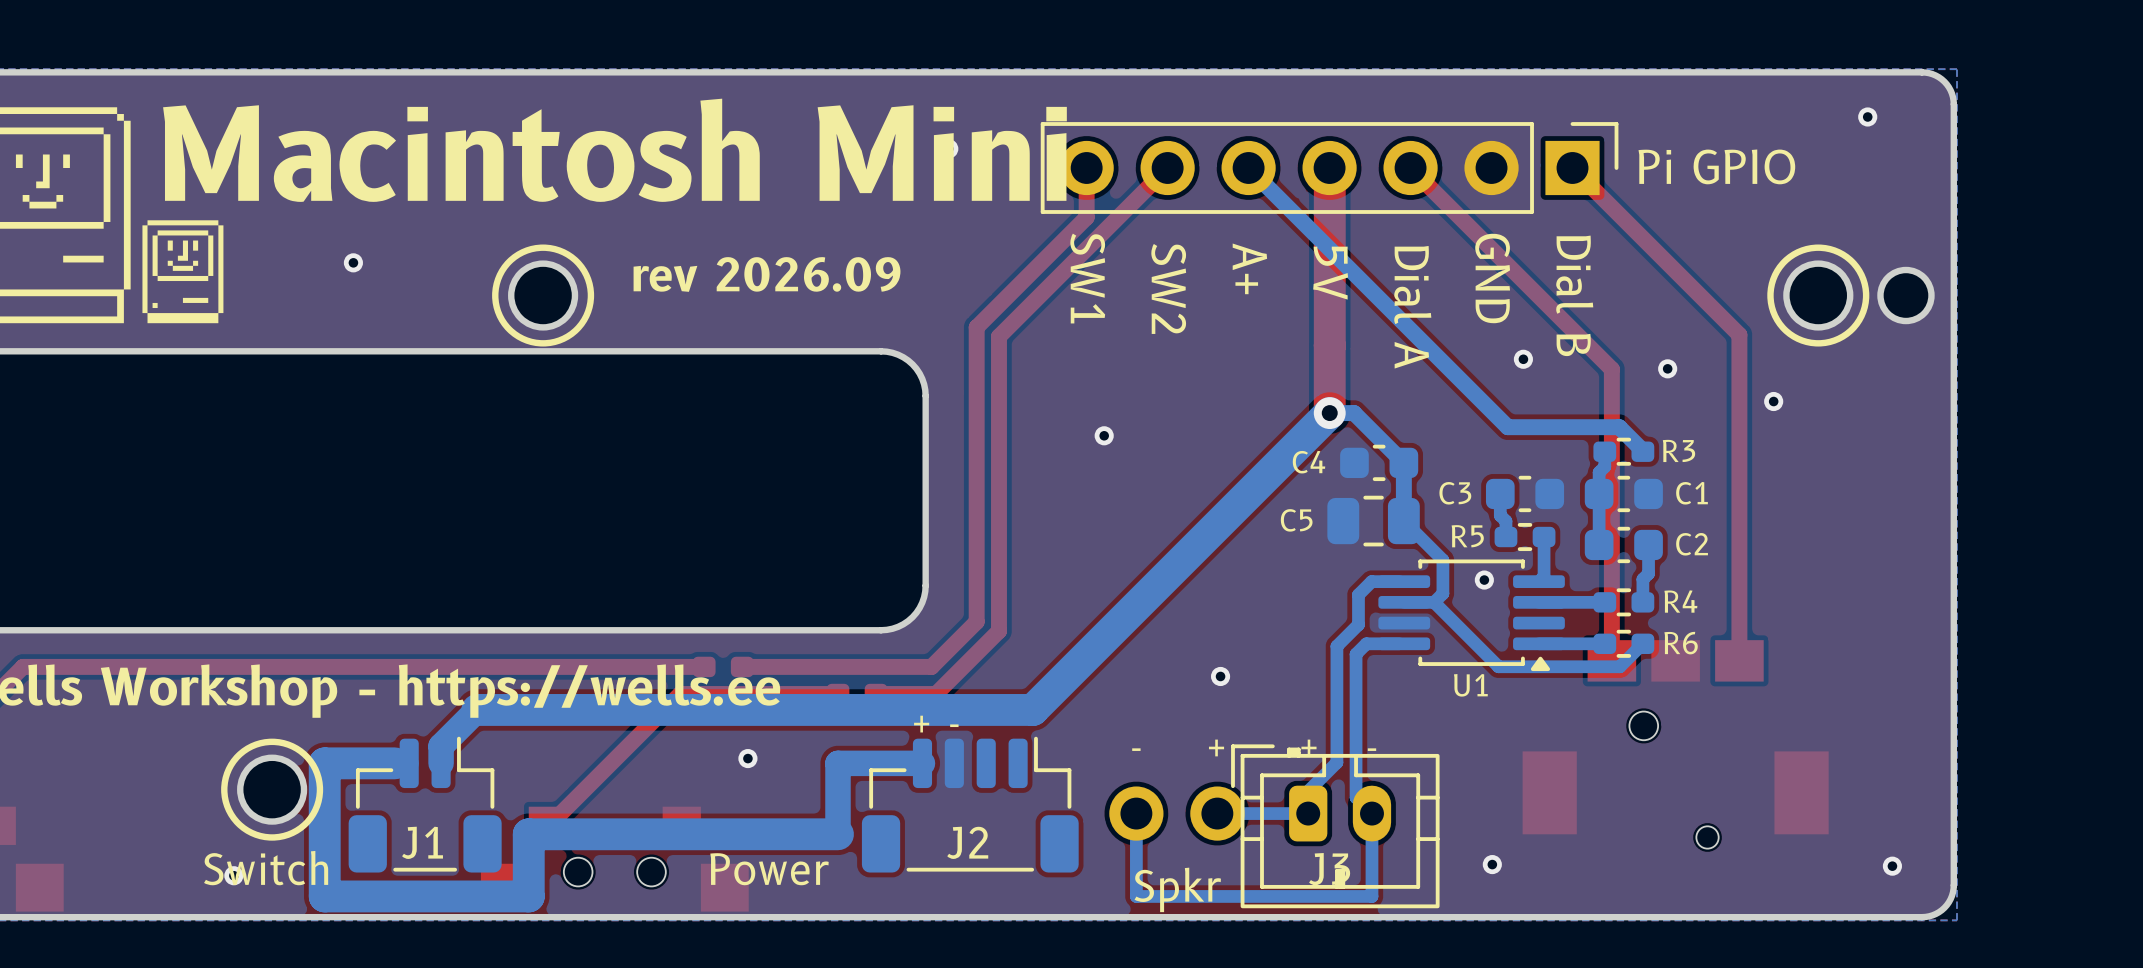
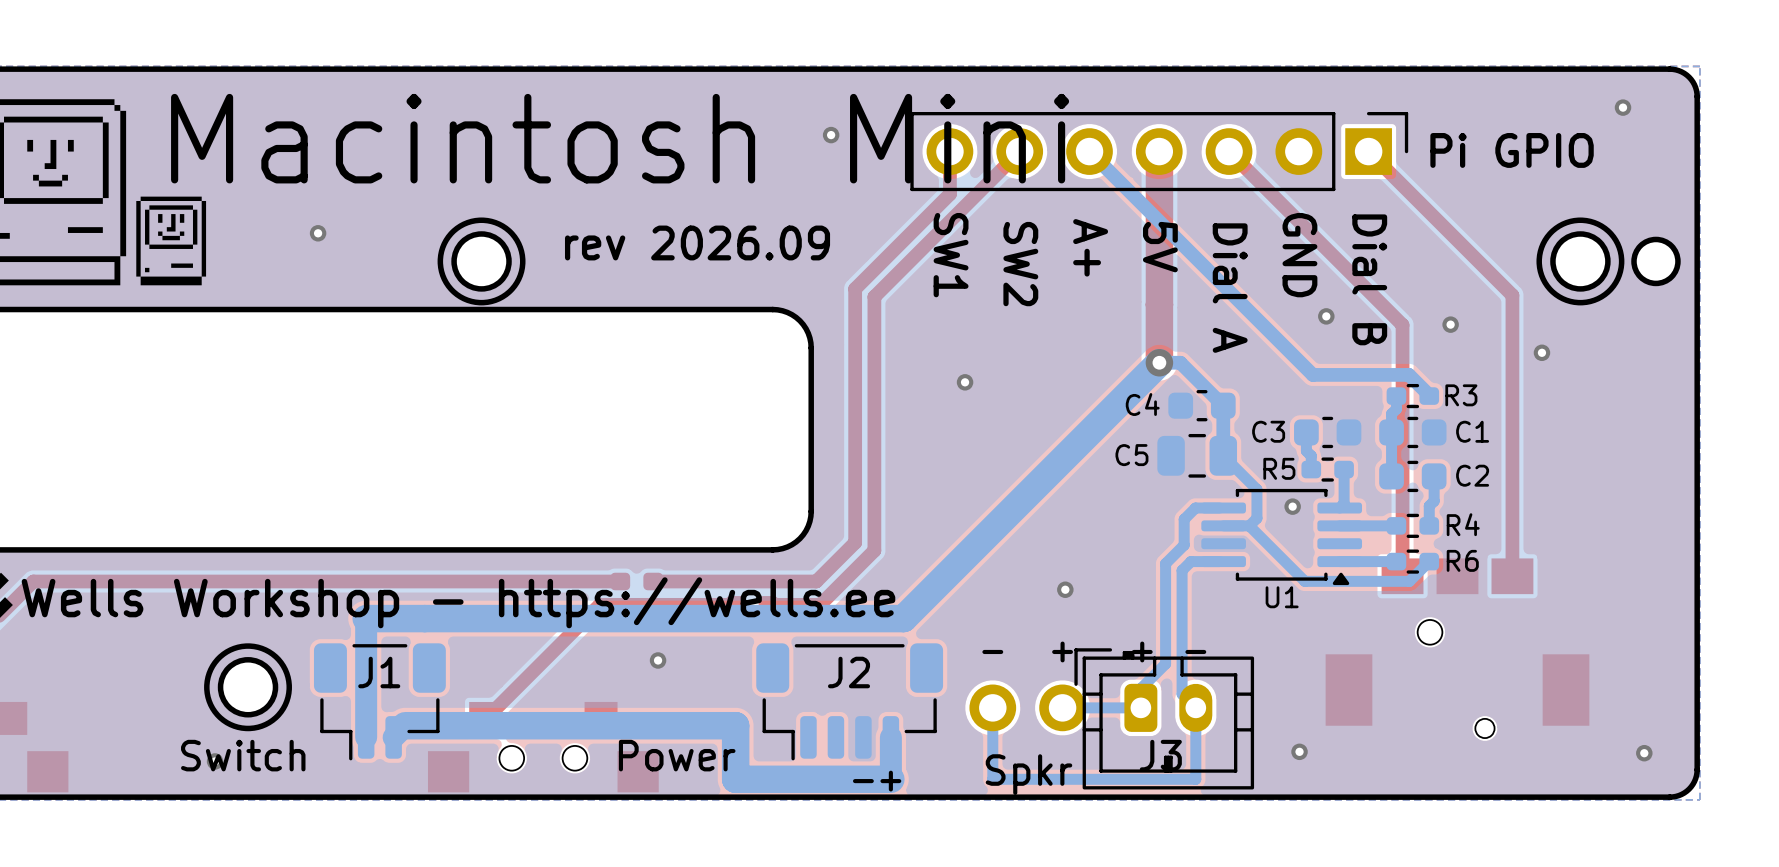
bottom track: (477, 709) (441, 746) (441, 763) -> (424, 618) (366, 618) (366, 737)
text position: + (921, 724) -> + (890, 781)
text position: - (954, 725) -> - (863, 781)
bottom track: (409, 763) (324, 763) (324, 896) (528, 896) (528, 834) -> (393, 737) (405, 725) (469, 725)
bottom track: (922, 763) (837, 763) (837, 834) -> (890, 737) (890, 779) (735, 779) (735, 725)
J1 rotation: 0° (425, 804) -> 180° (379, 701)
J2 rotation: 0° (970, 804) -> 180° (849, 701)

